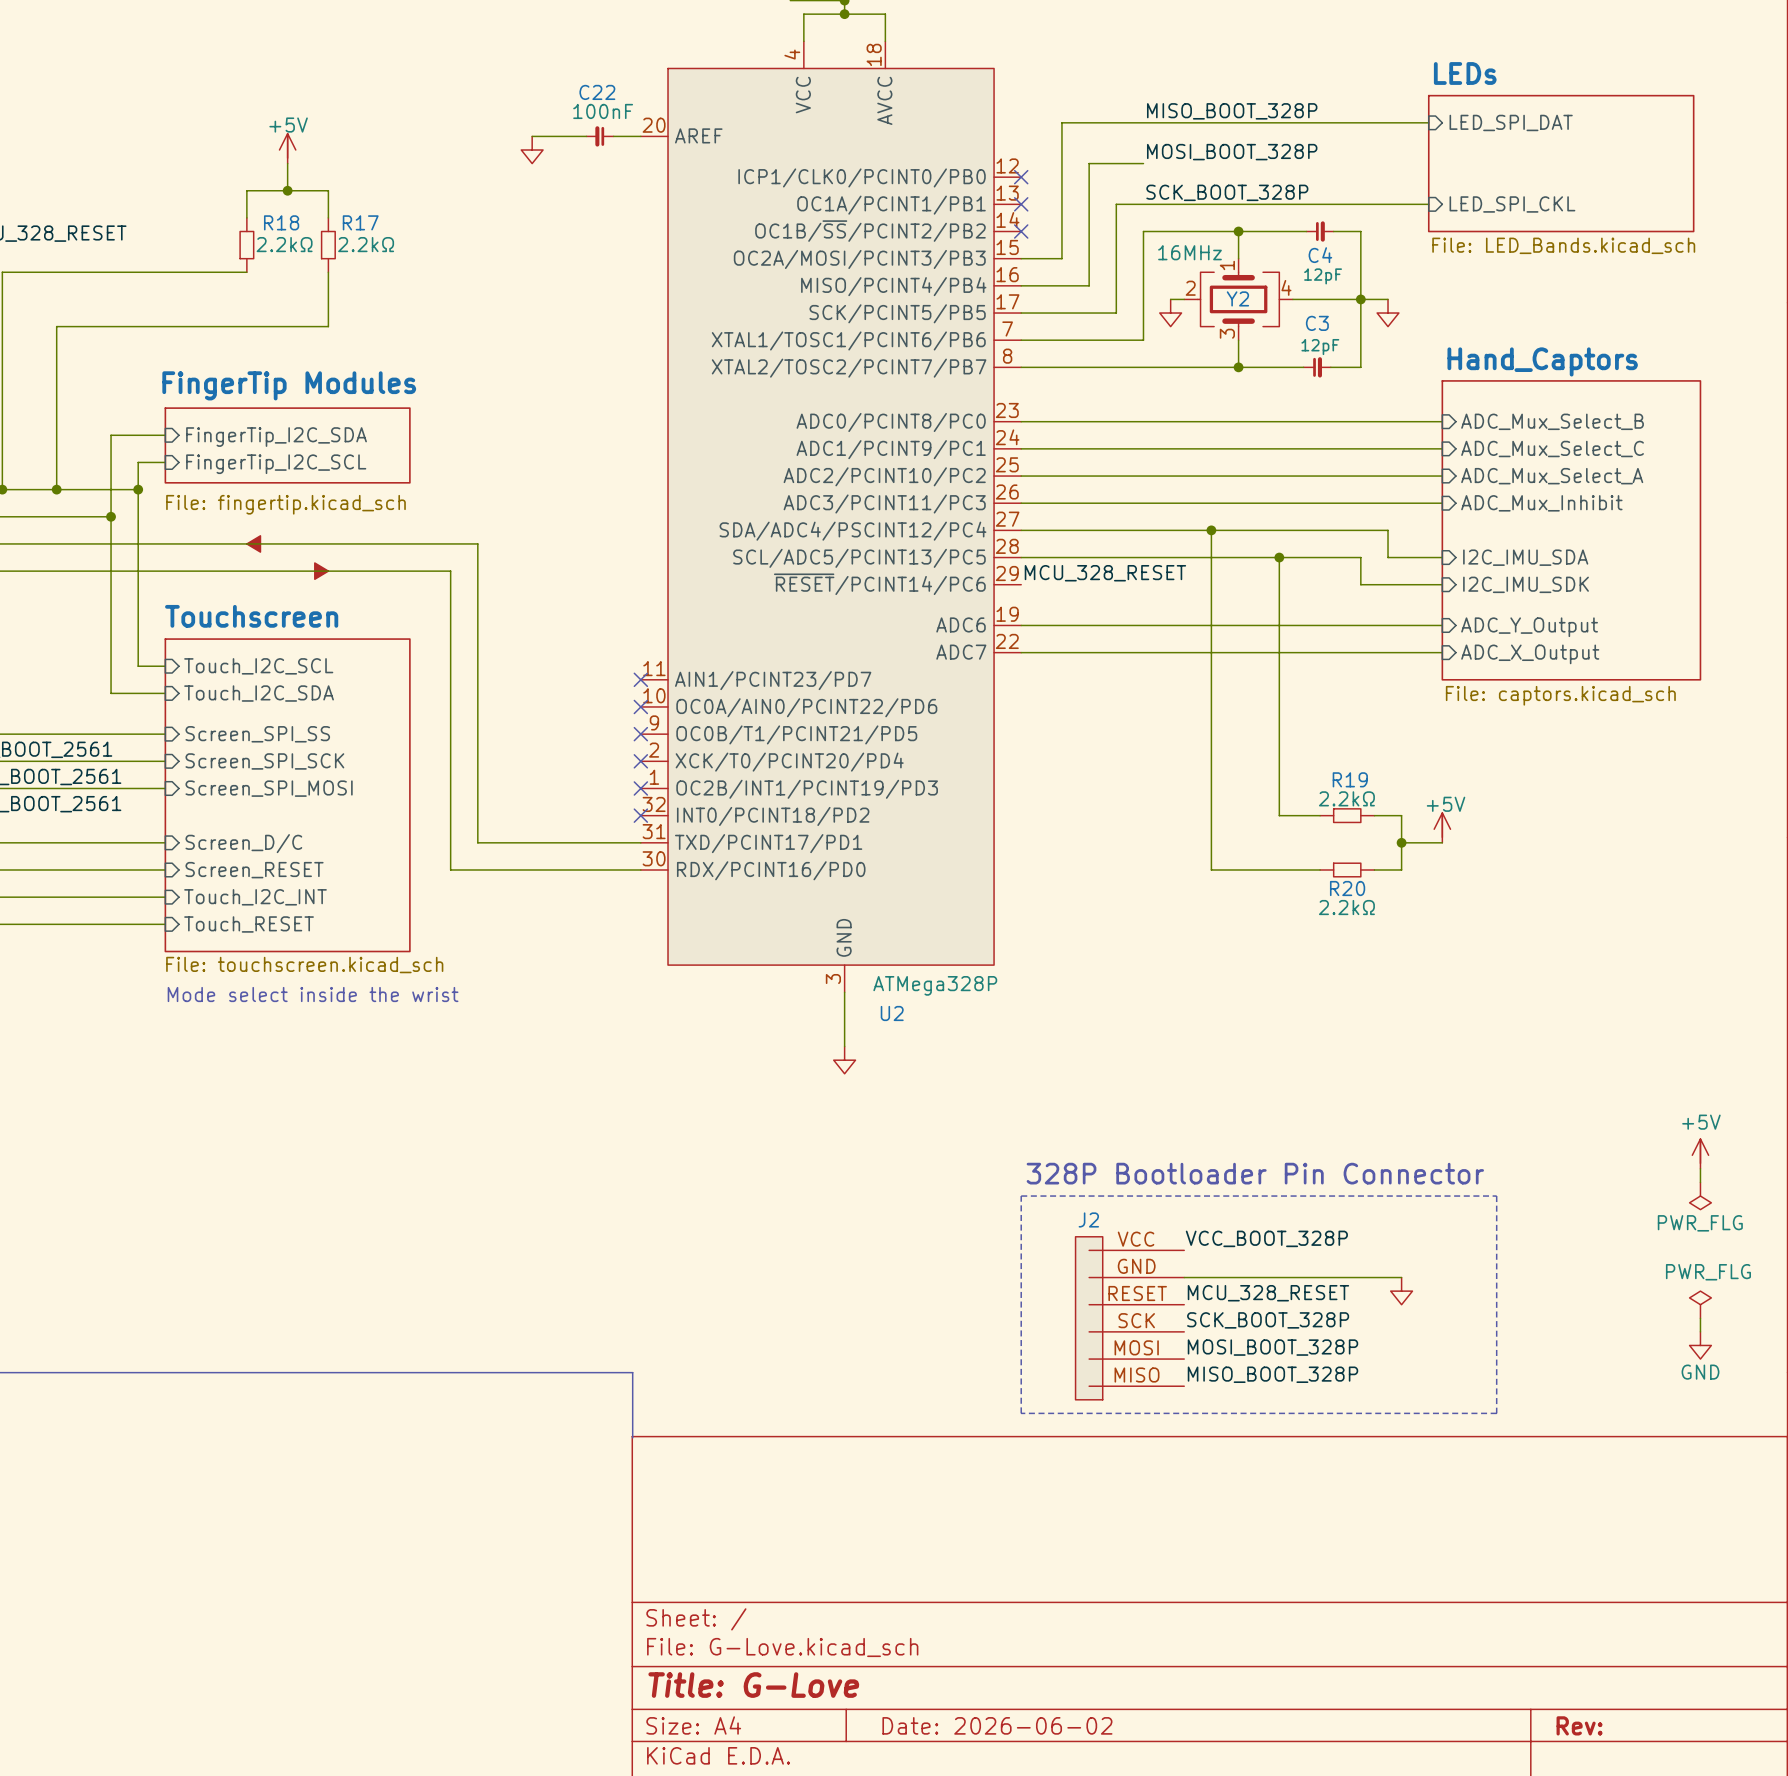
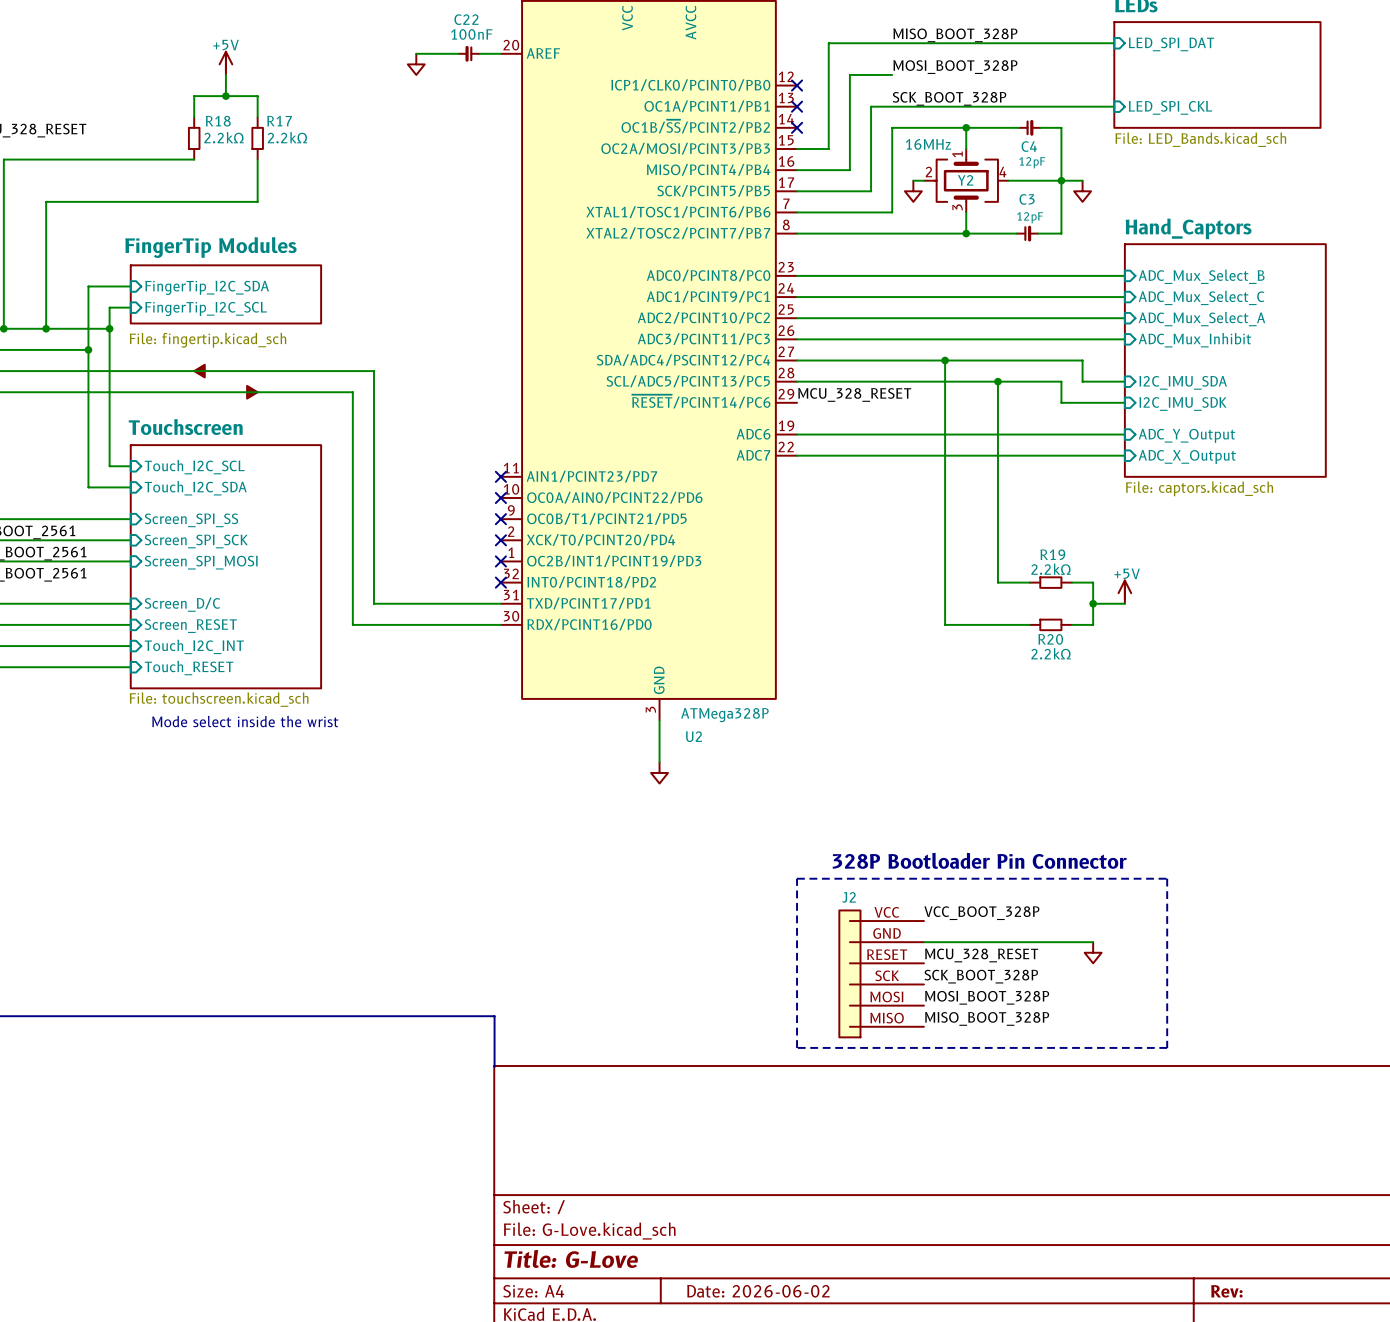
power symbol: +5V (1700, 1153) -> none
wire: (1700, 1168) (1700, 1182) -> none
power symbol: PWR_FLG (1700, 1196) -> none
power symbol: PWR_FLG (1700, 1304) -> none
wire: (1700, 1318) (1700, 1331) -> none
power symbol: GND (1700, 1345) -> none

